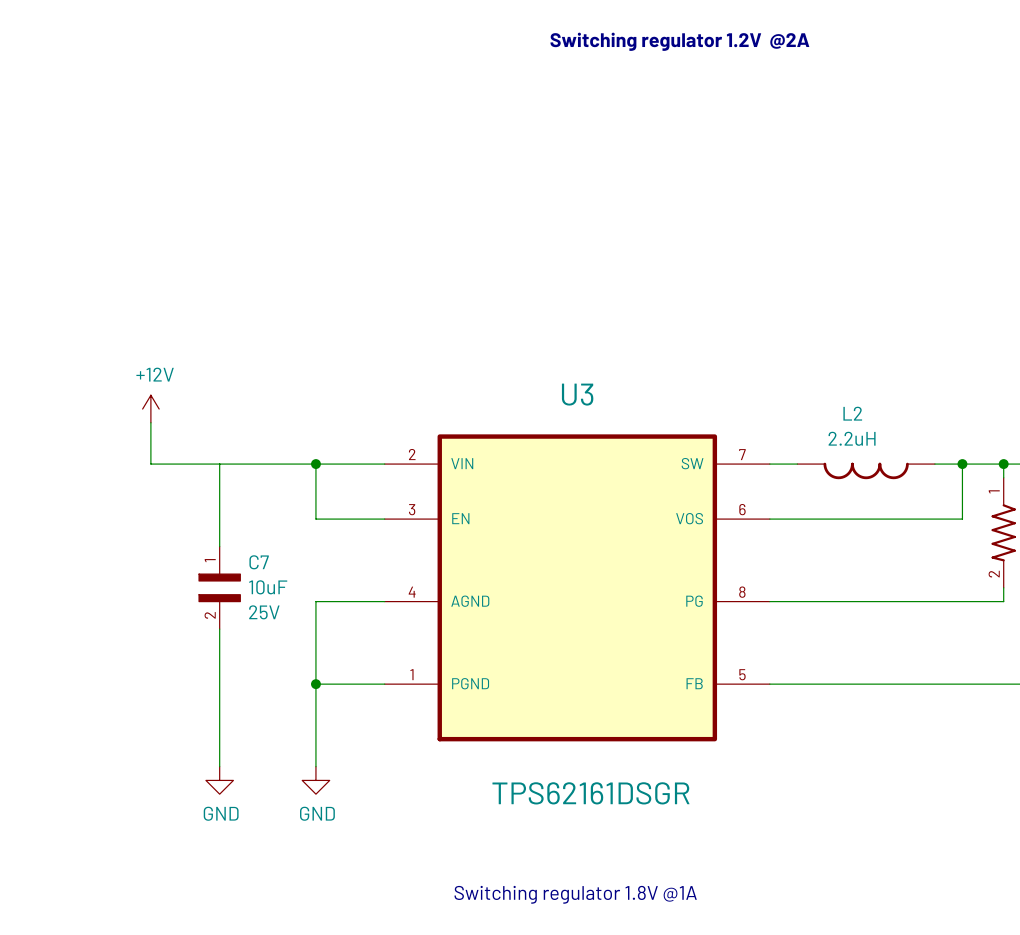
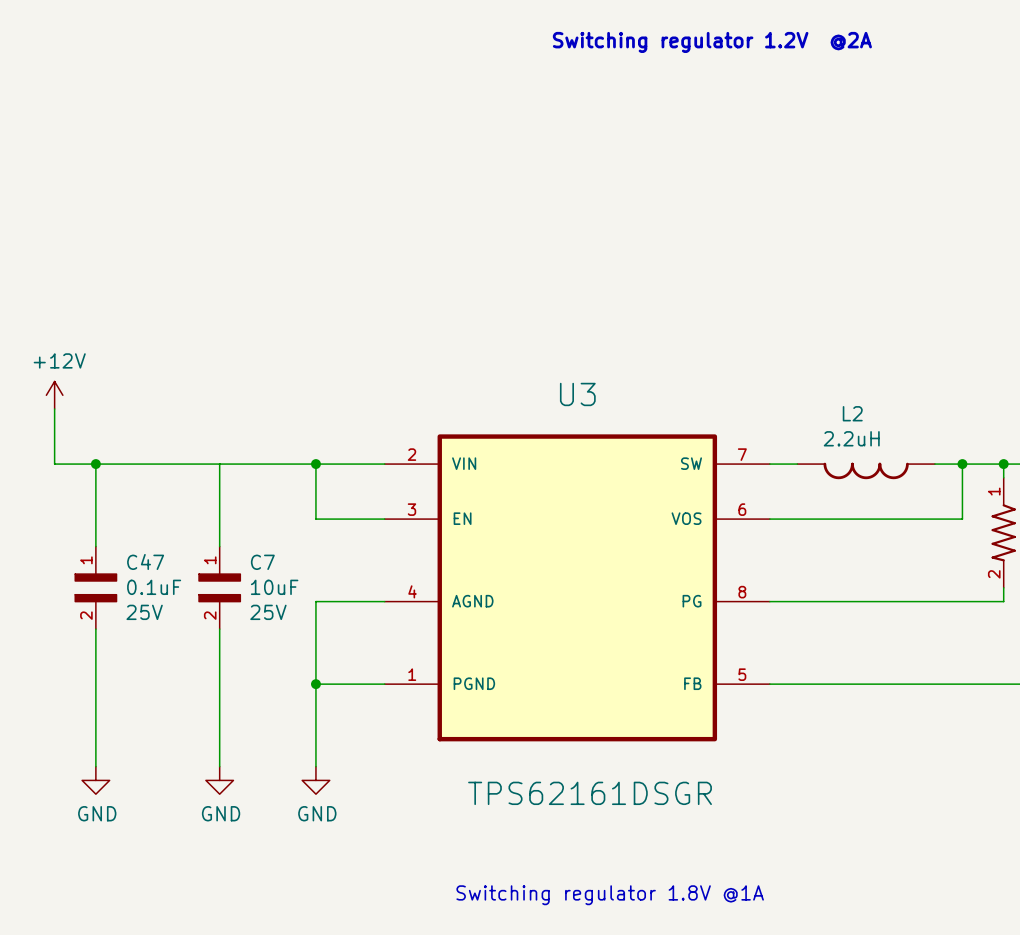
power symbol position: +12V (150, 409) -> +12V (54, 395)
wire: (150, 422) (150, 464) -> (54, 409) (54, 464) (150, 464)
wire: none -> (95, 464) (95, 546)
junction: none -> (95, 464)
C47: none -> (95, 587)
wire: none -> (95, 629) (95, 766)
power symbol: none -> GND (95, 780)

